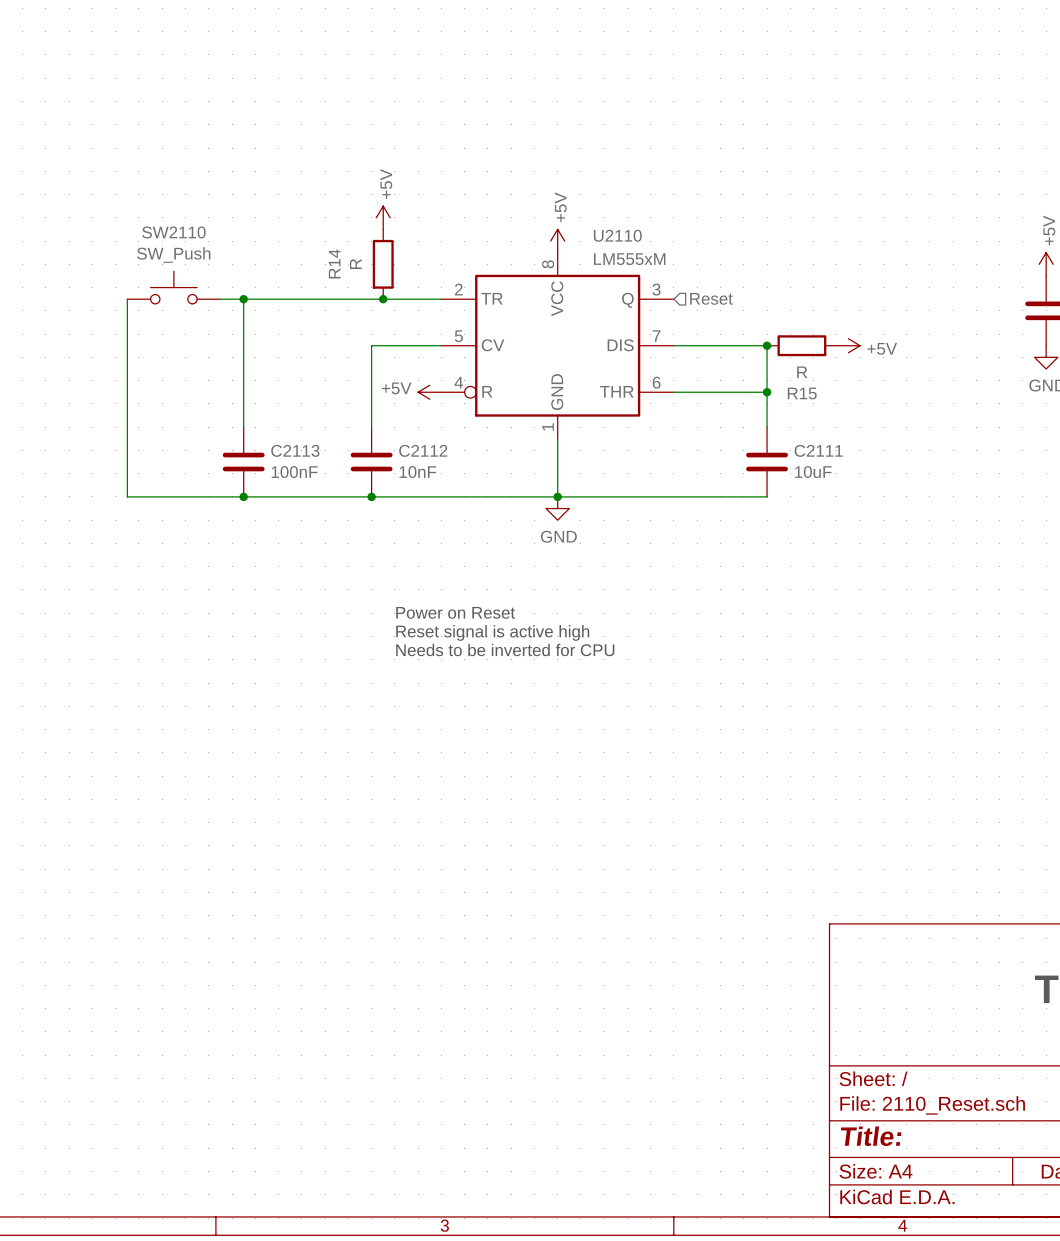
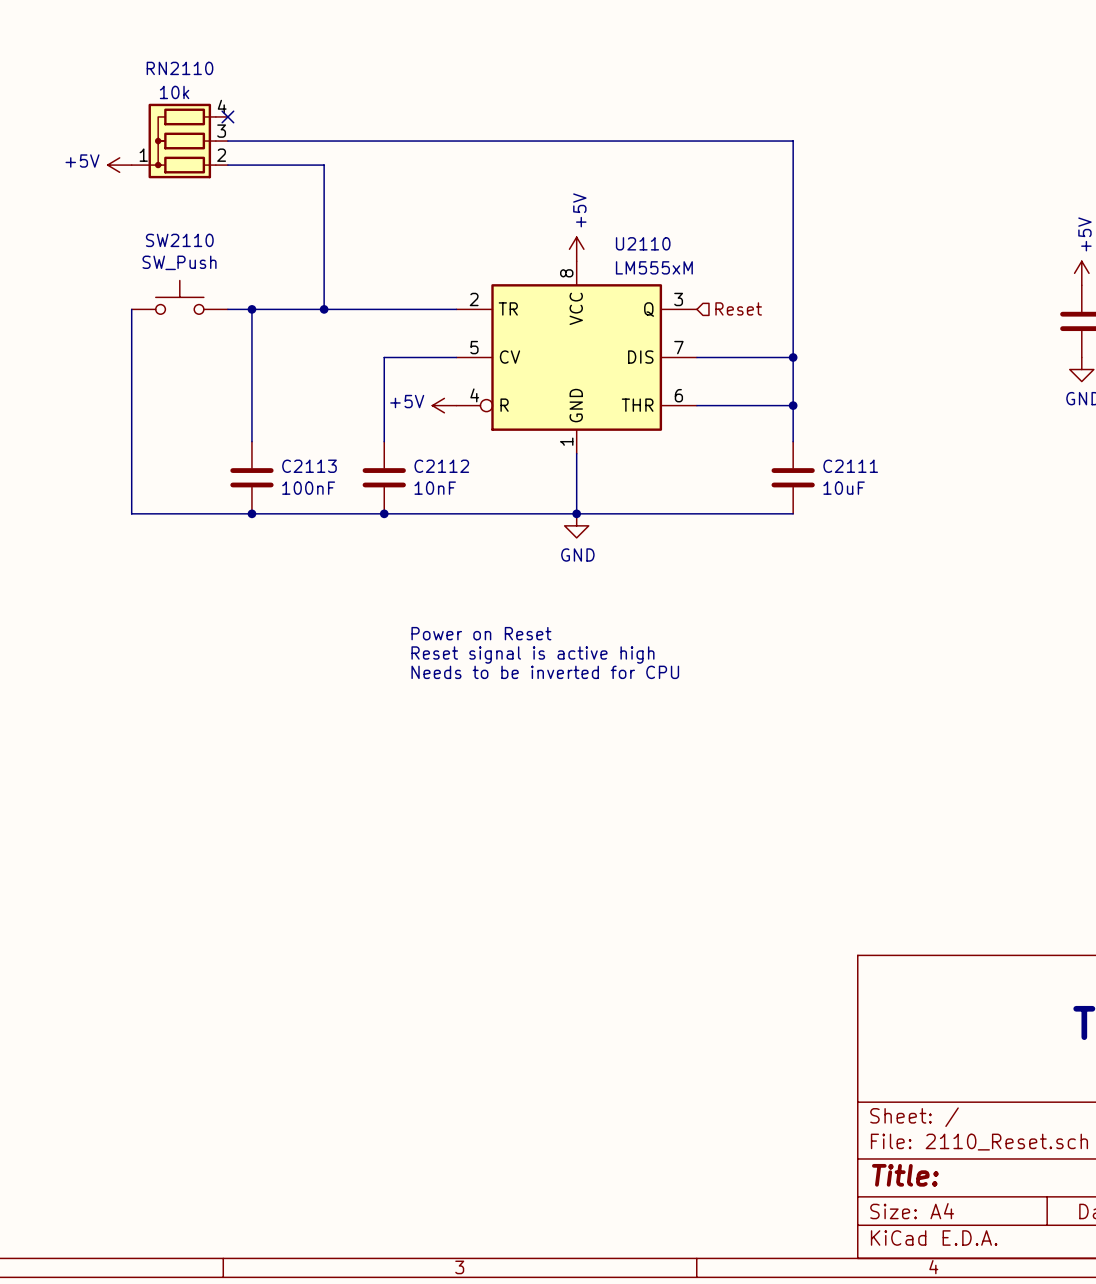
no-connect mark: none -> (227, 116)
RN2110: none -> 10k (179, 141)
wire: none -> (227, 141) (793, 141) (793, 357)
power symbol: none -> +5V (119, 165)
wire: none -> (227, 165) (324, 165) (324, 309)
power symbol: +5V (383, 217) -> none
R14: R (383, 264) -> none
junction: none -> (324, 309)
junction: (383, 299) -> none
R15: R (801, 345) -> none
power symbol: +5V (848, 345) -> none

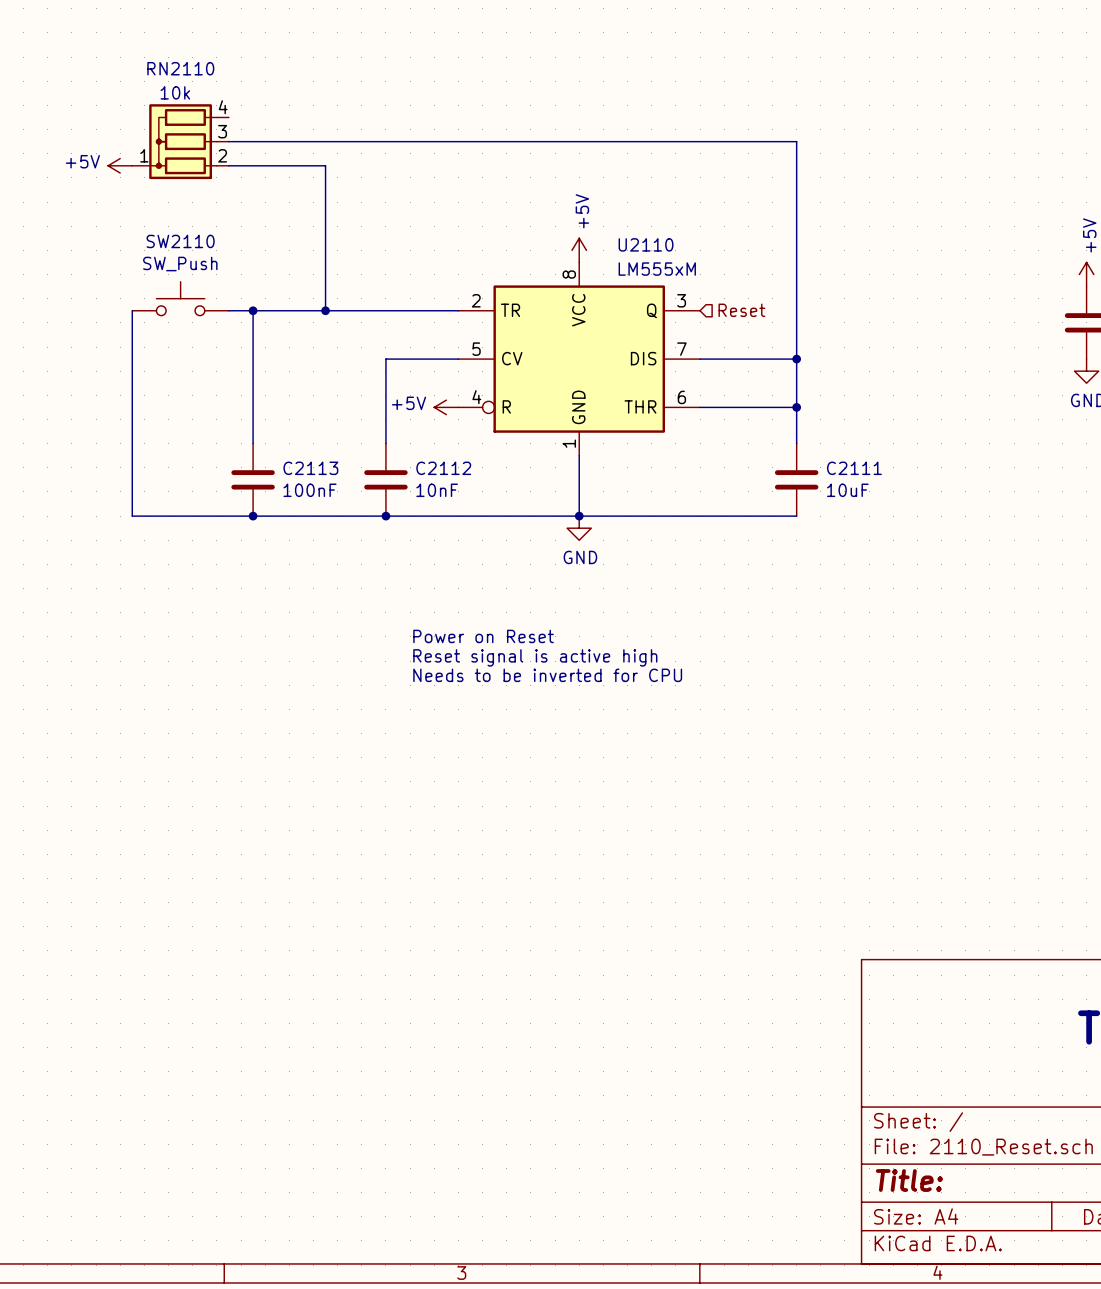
no-connect mark: (227, 116) -> none

